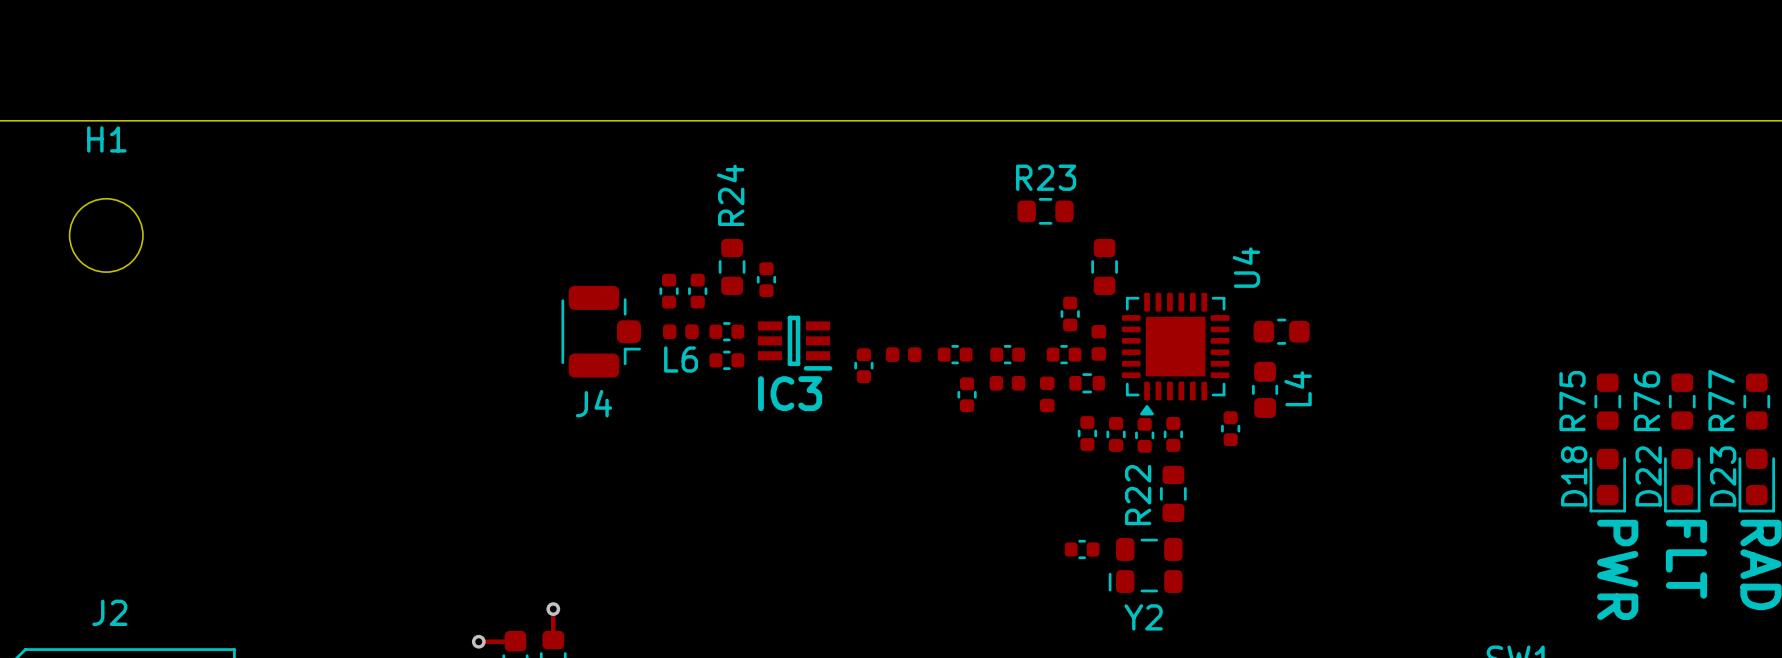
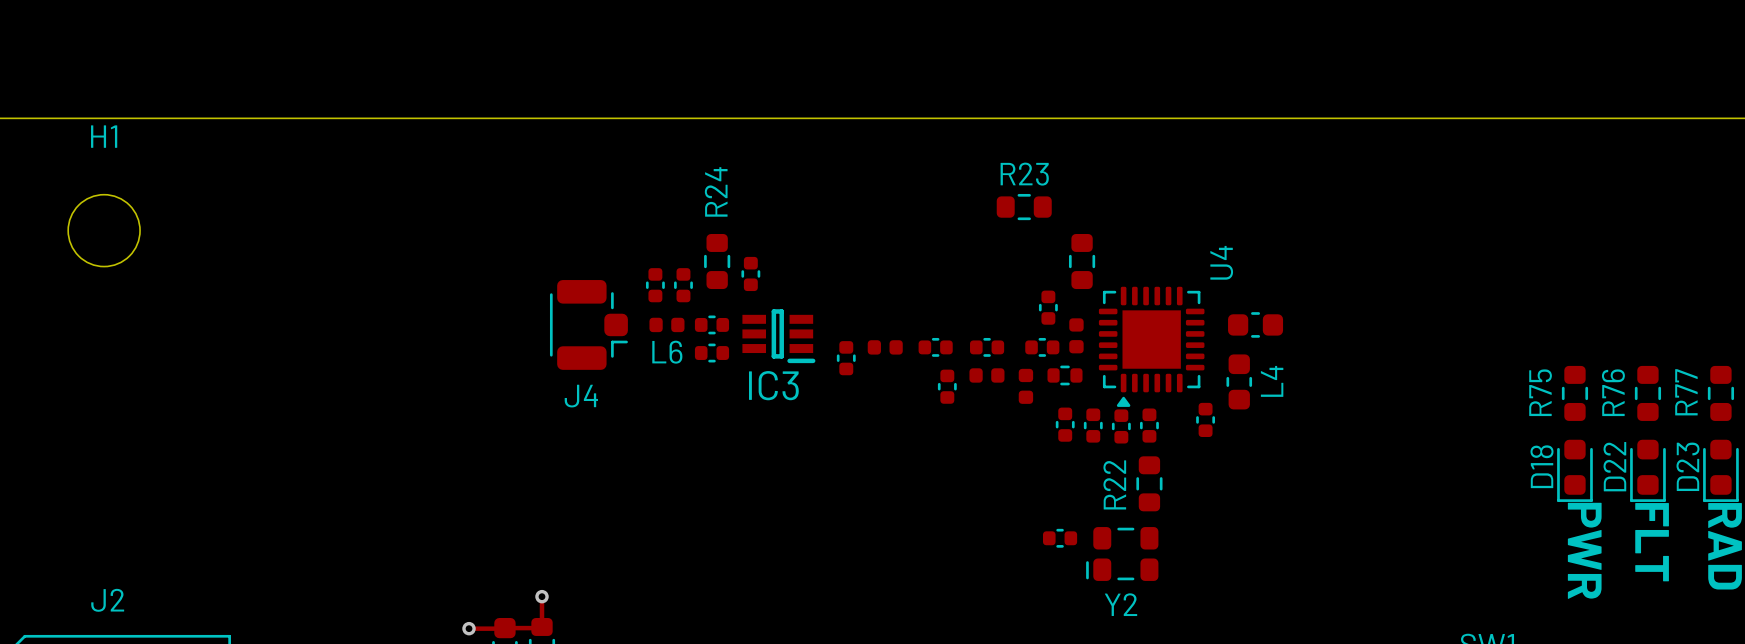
top track: none -> (504, 628) (540, 628)

